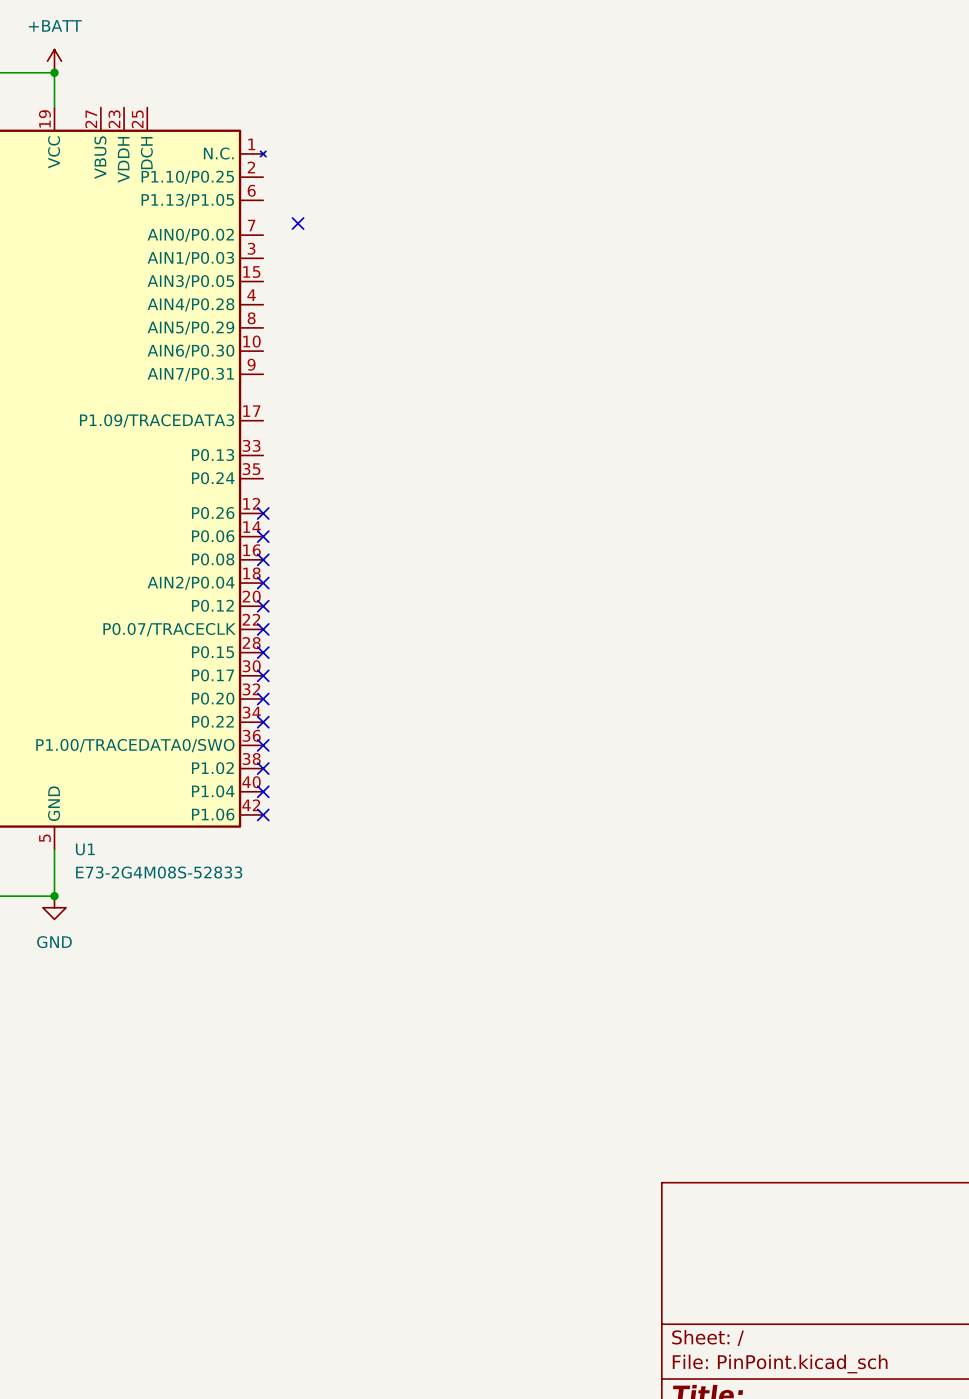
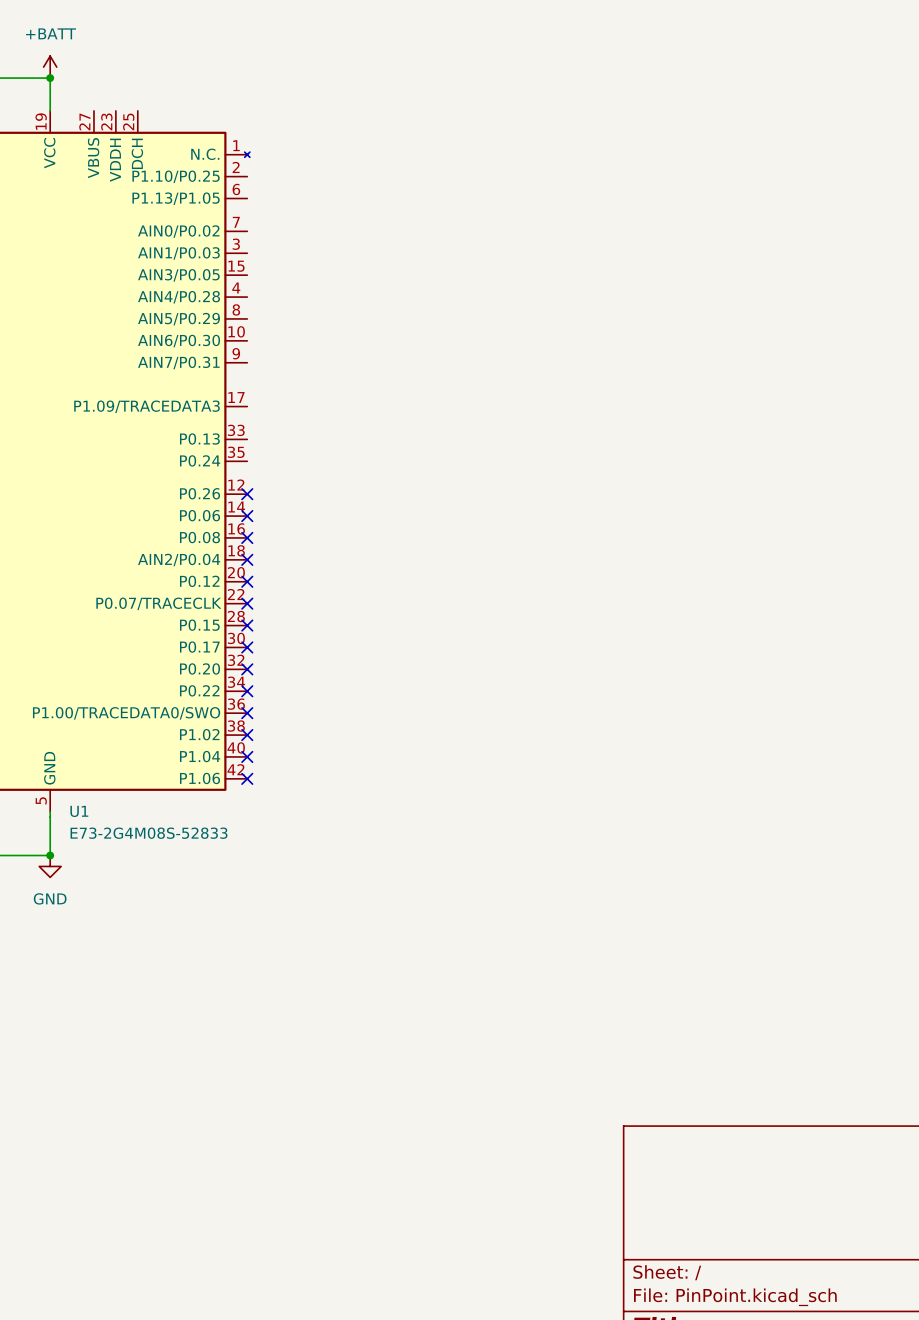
no-connect mark: (298, 223) -> none

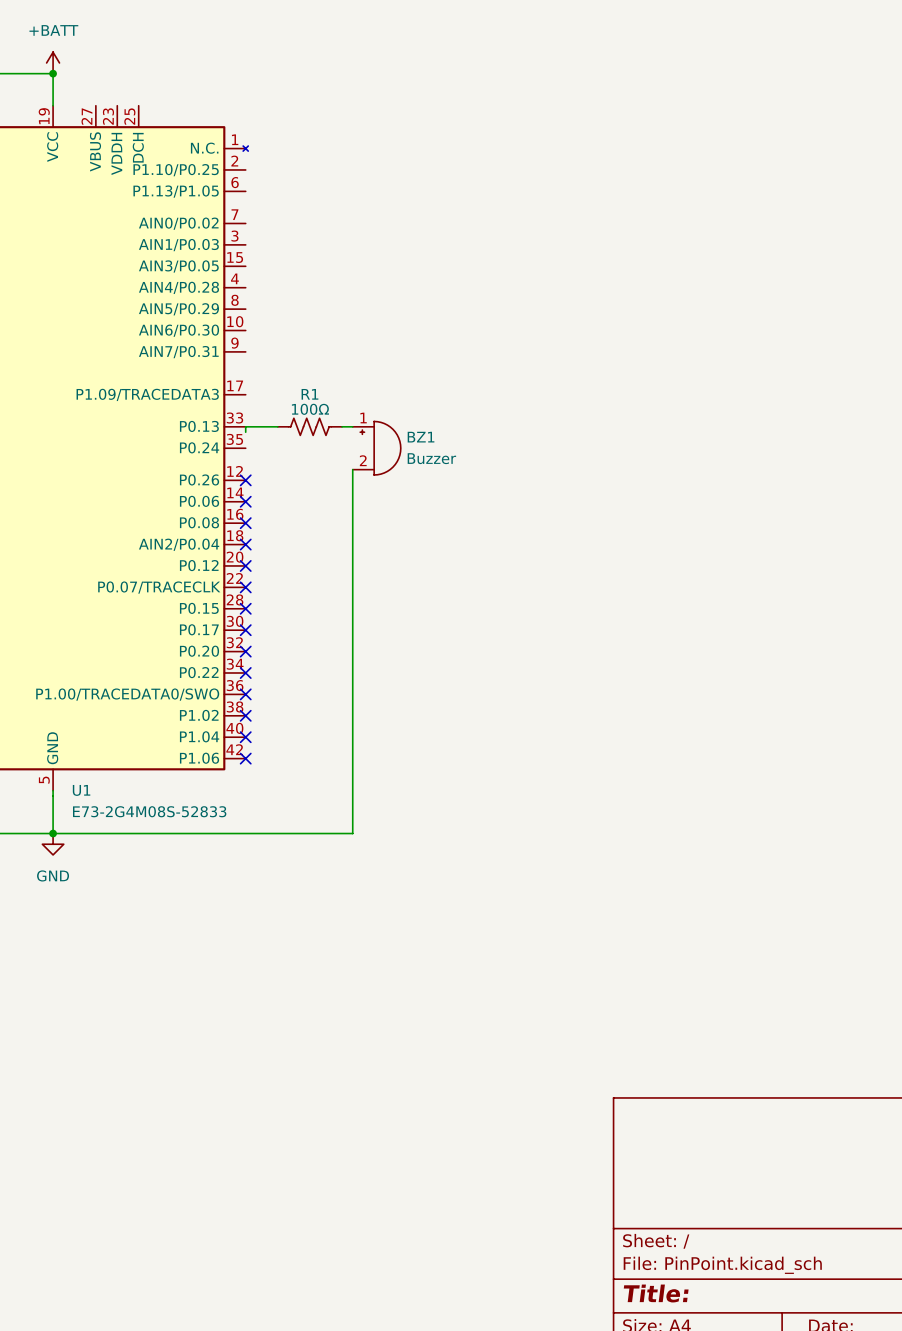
wire: none -> (277, 426) (245, 426) (245, 432)
R1: none -> 100Ω (309, 426)
wire: none -> (342, 426) (352, 426)
BZ1: none -> Buzzer (376, 448)
wire: none -> (352, 469) (352, 833) (53, 833)

